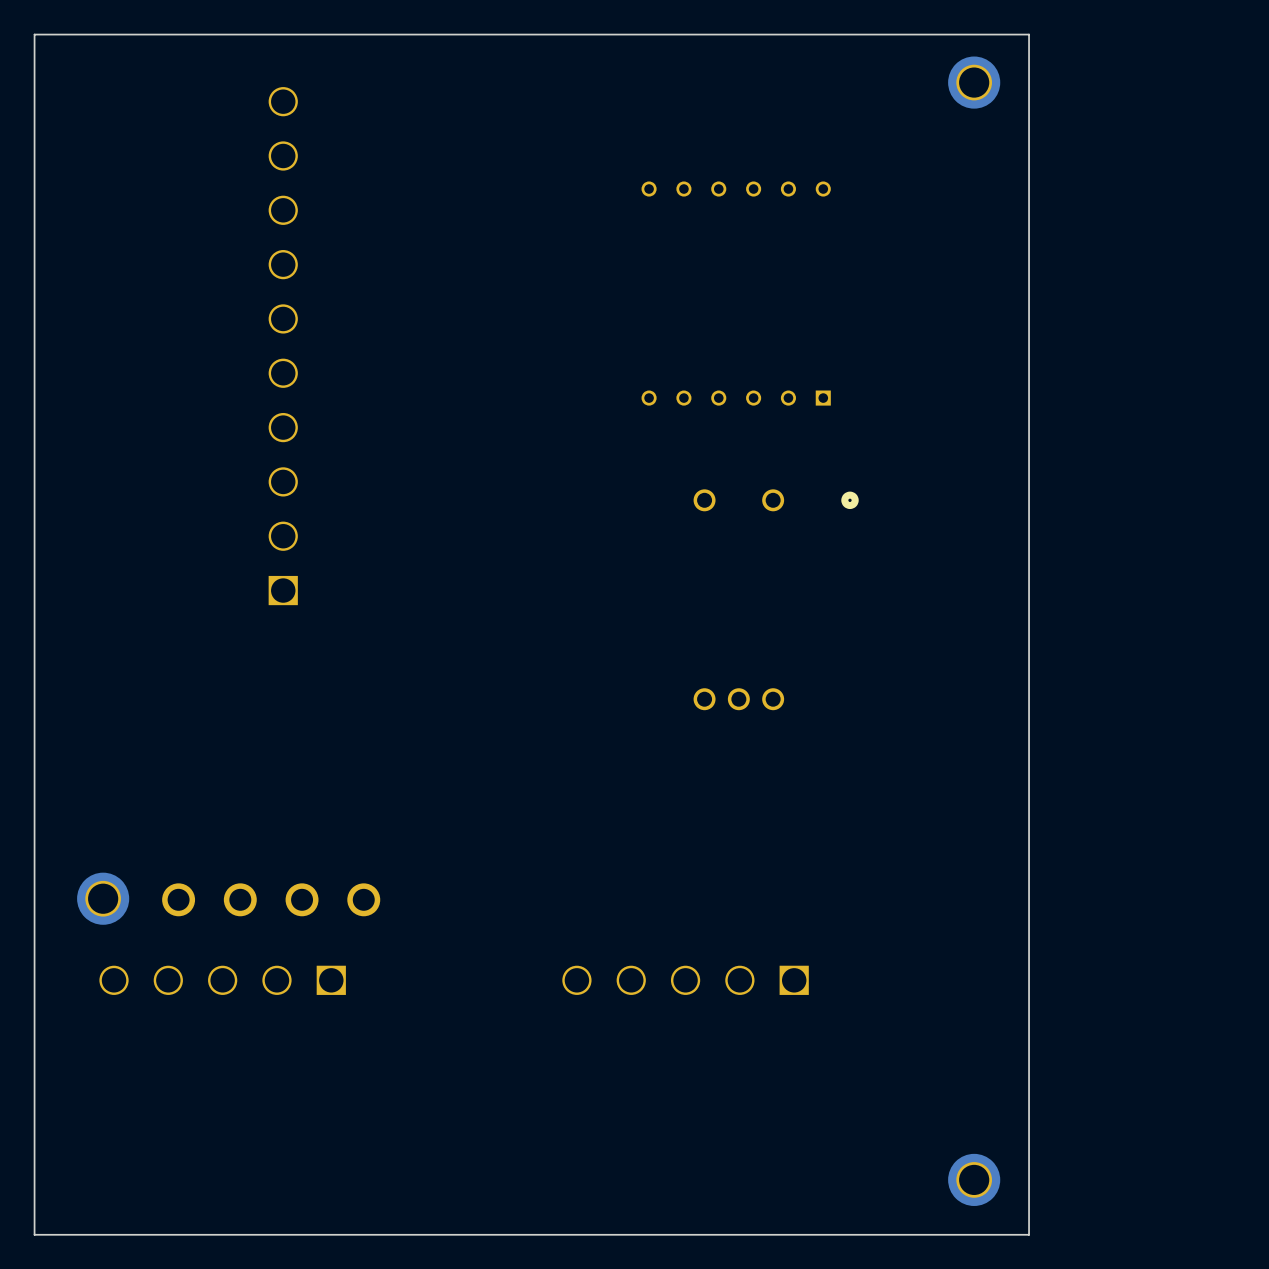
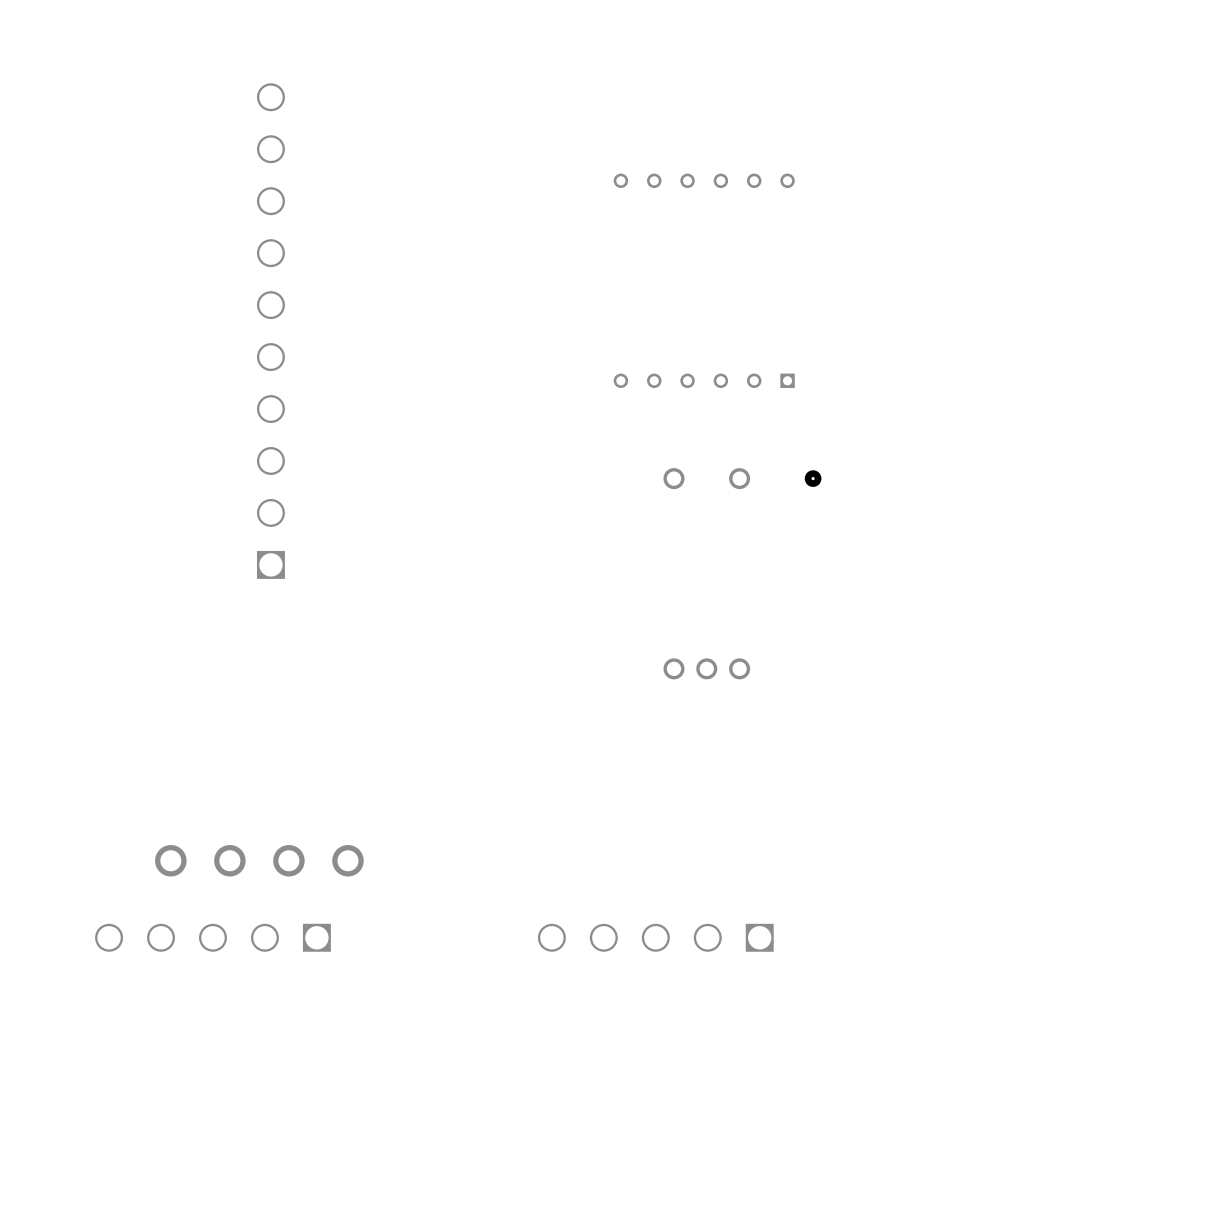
board edge: (1029, 34) (34, 34) (34, 1234) (1029, 1234) (1029, 34) -> none
part: (974, 82) -> none
part: (103, 898) -> none
part: (974, 1179) -> none

